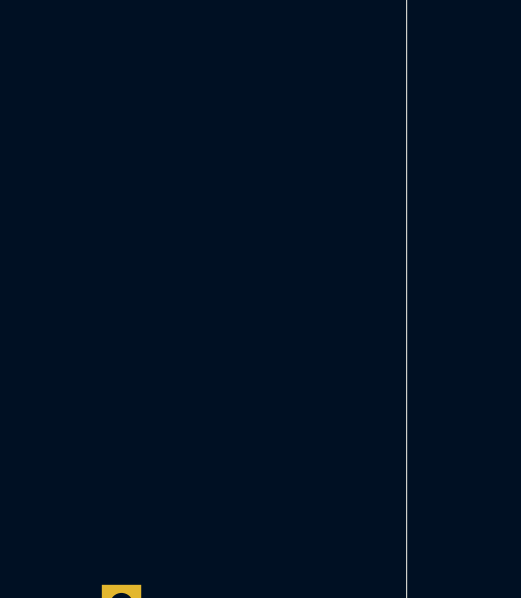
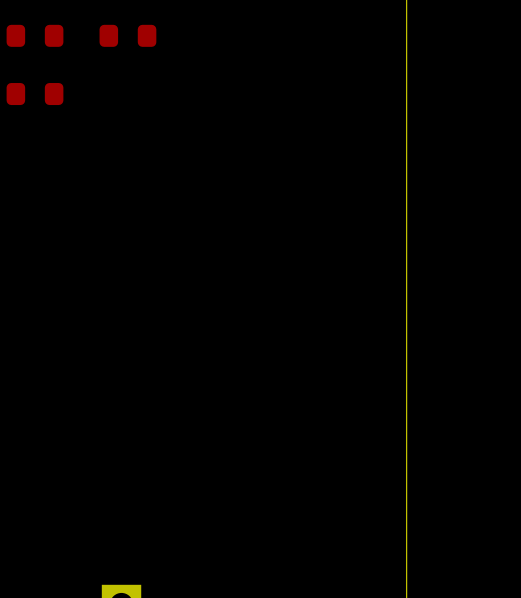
part: none -> (34, 35)
part: none -> (127, 35)
part: none -> (34, 94)

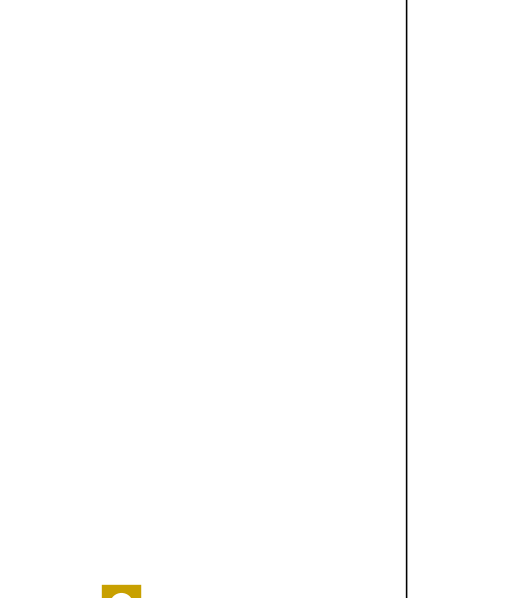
part: (34, 35) -> none
part: (127, 35) -> none
part: (34, 94) -> none

